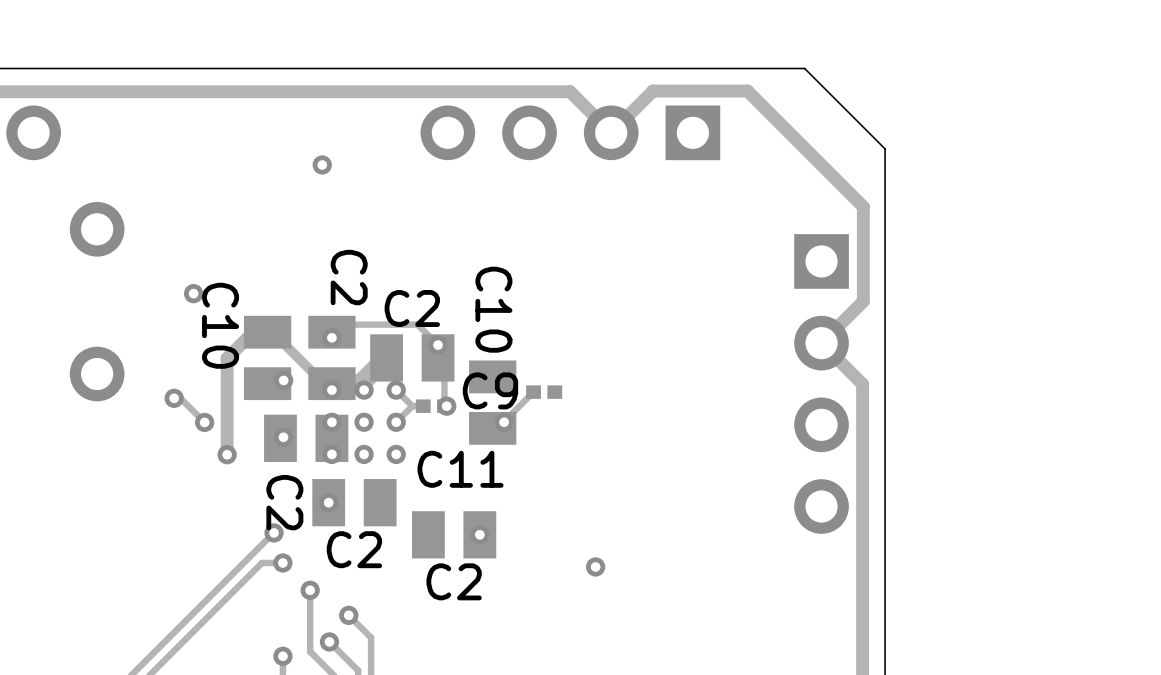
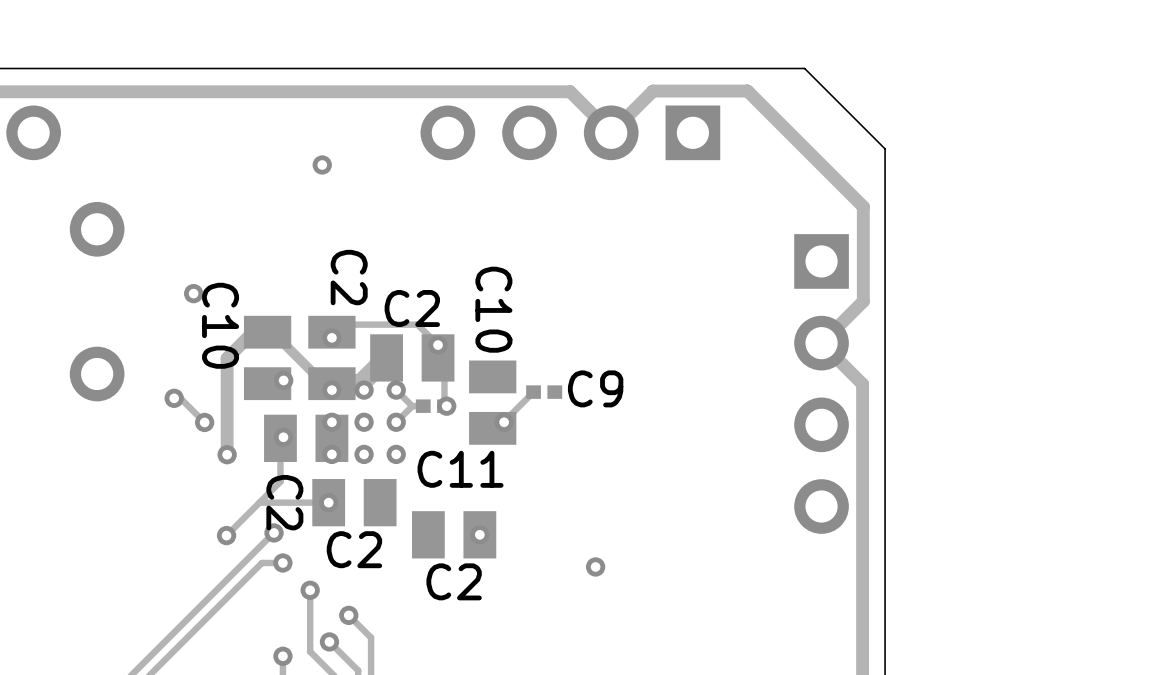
C9 name position: C9 (490, 390) -> C9 (595, 388)
track: none -> (280, 438) (280, 481) (226, 535)
track: none -> (328, 502) (259, 502)
via: none -> (226, 535)

